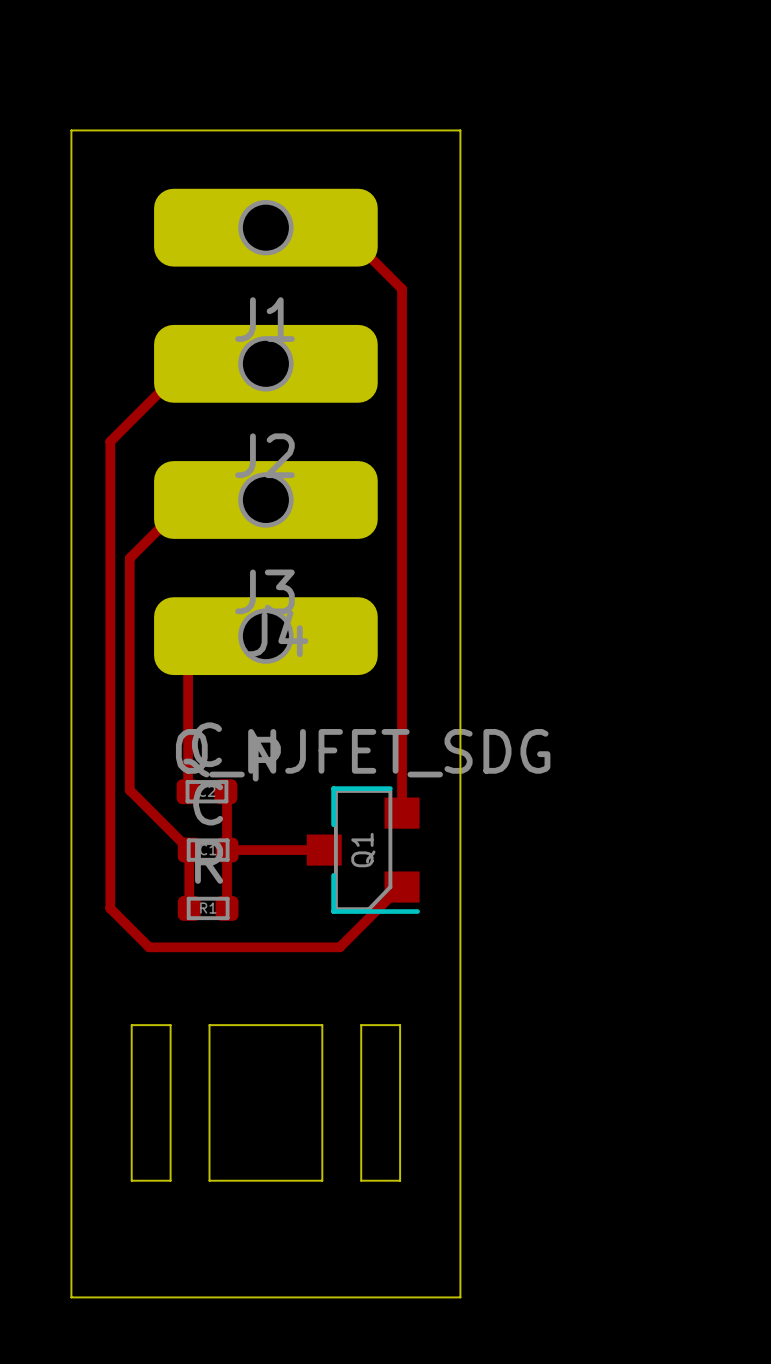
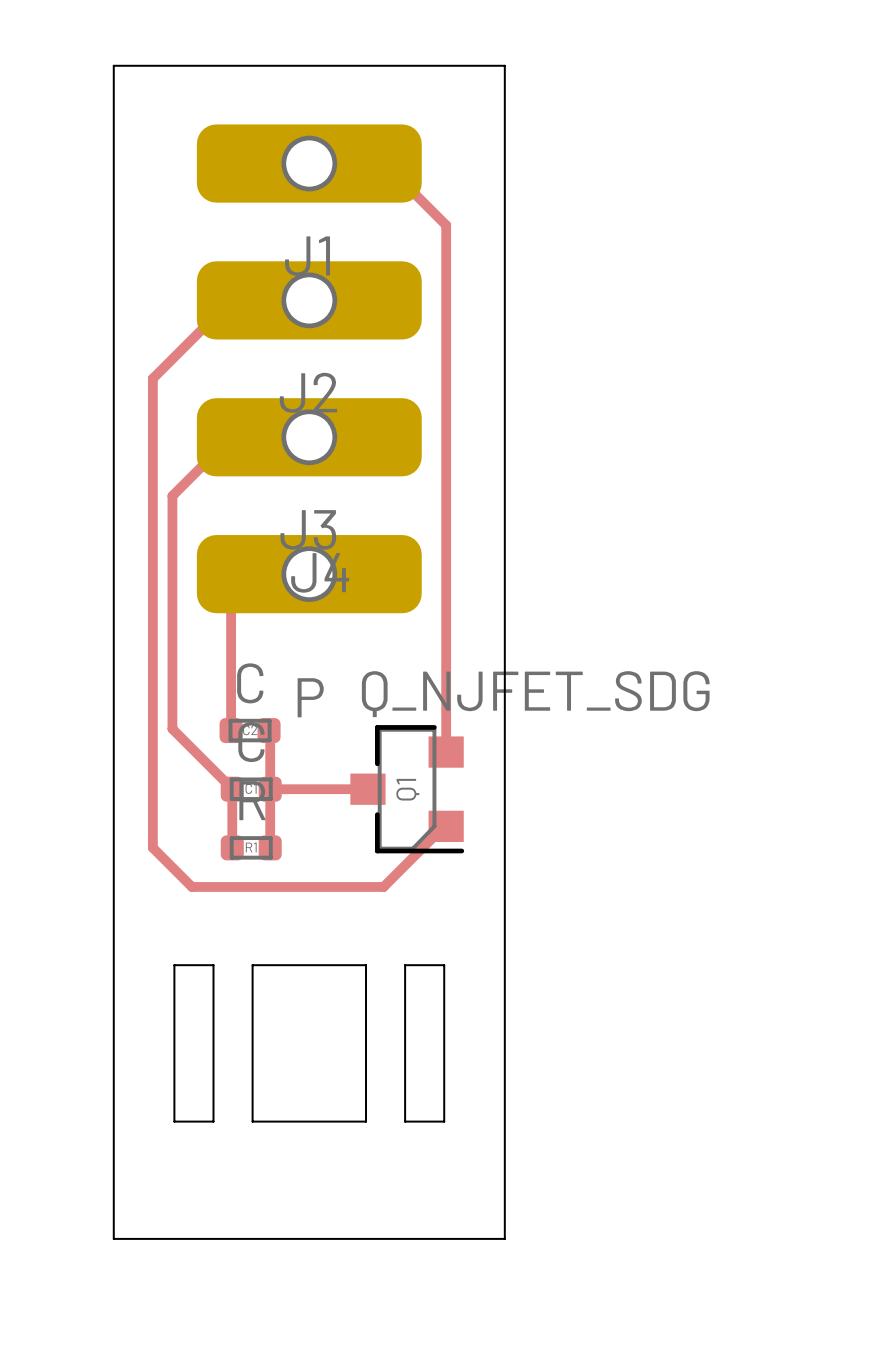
Q1 value position: Q_NJFET_SDG (363, 753) -> Q_NJFET_SDG (535, 694)

